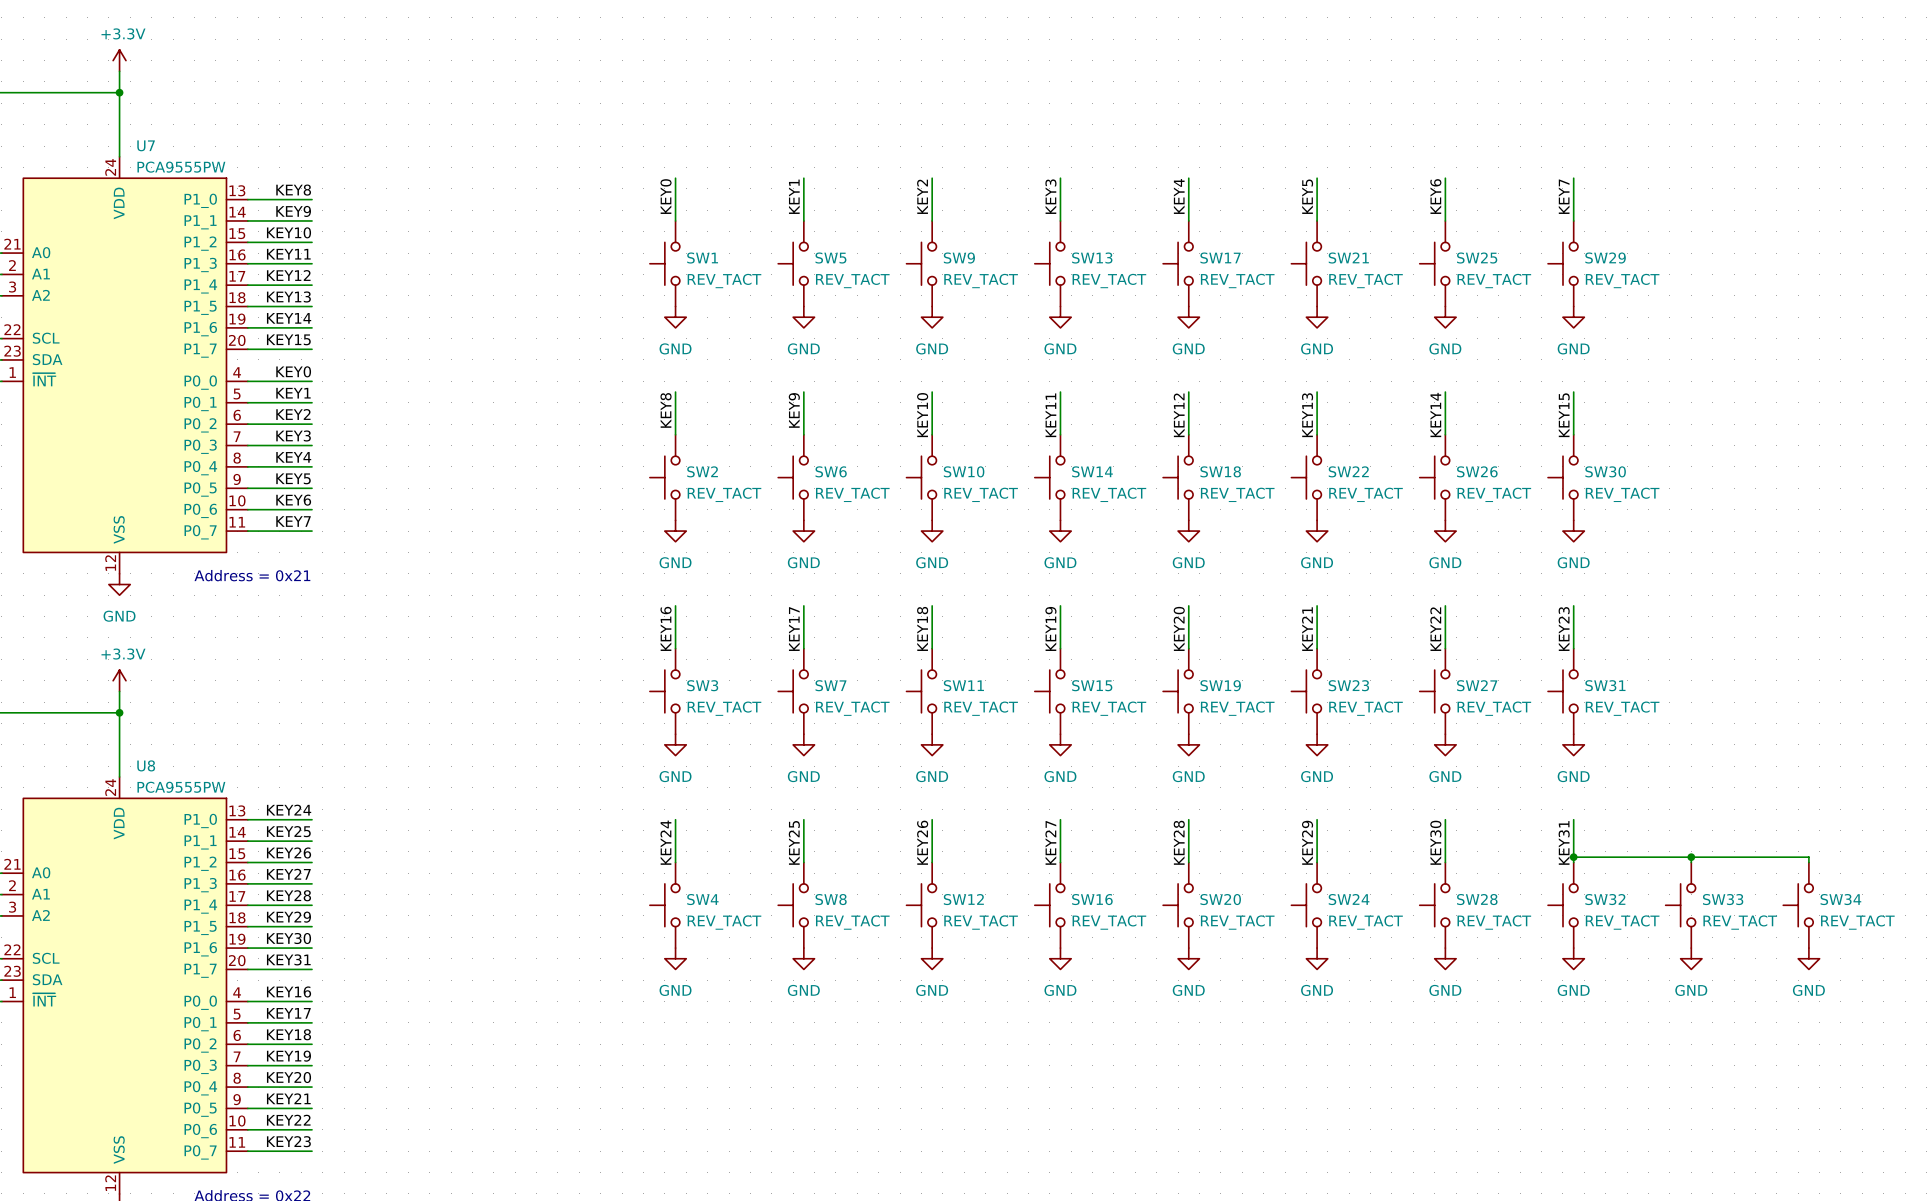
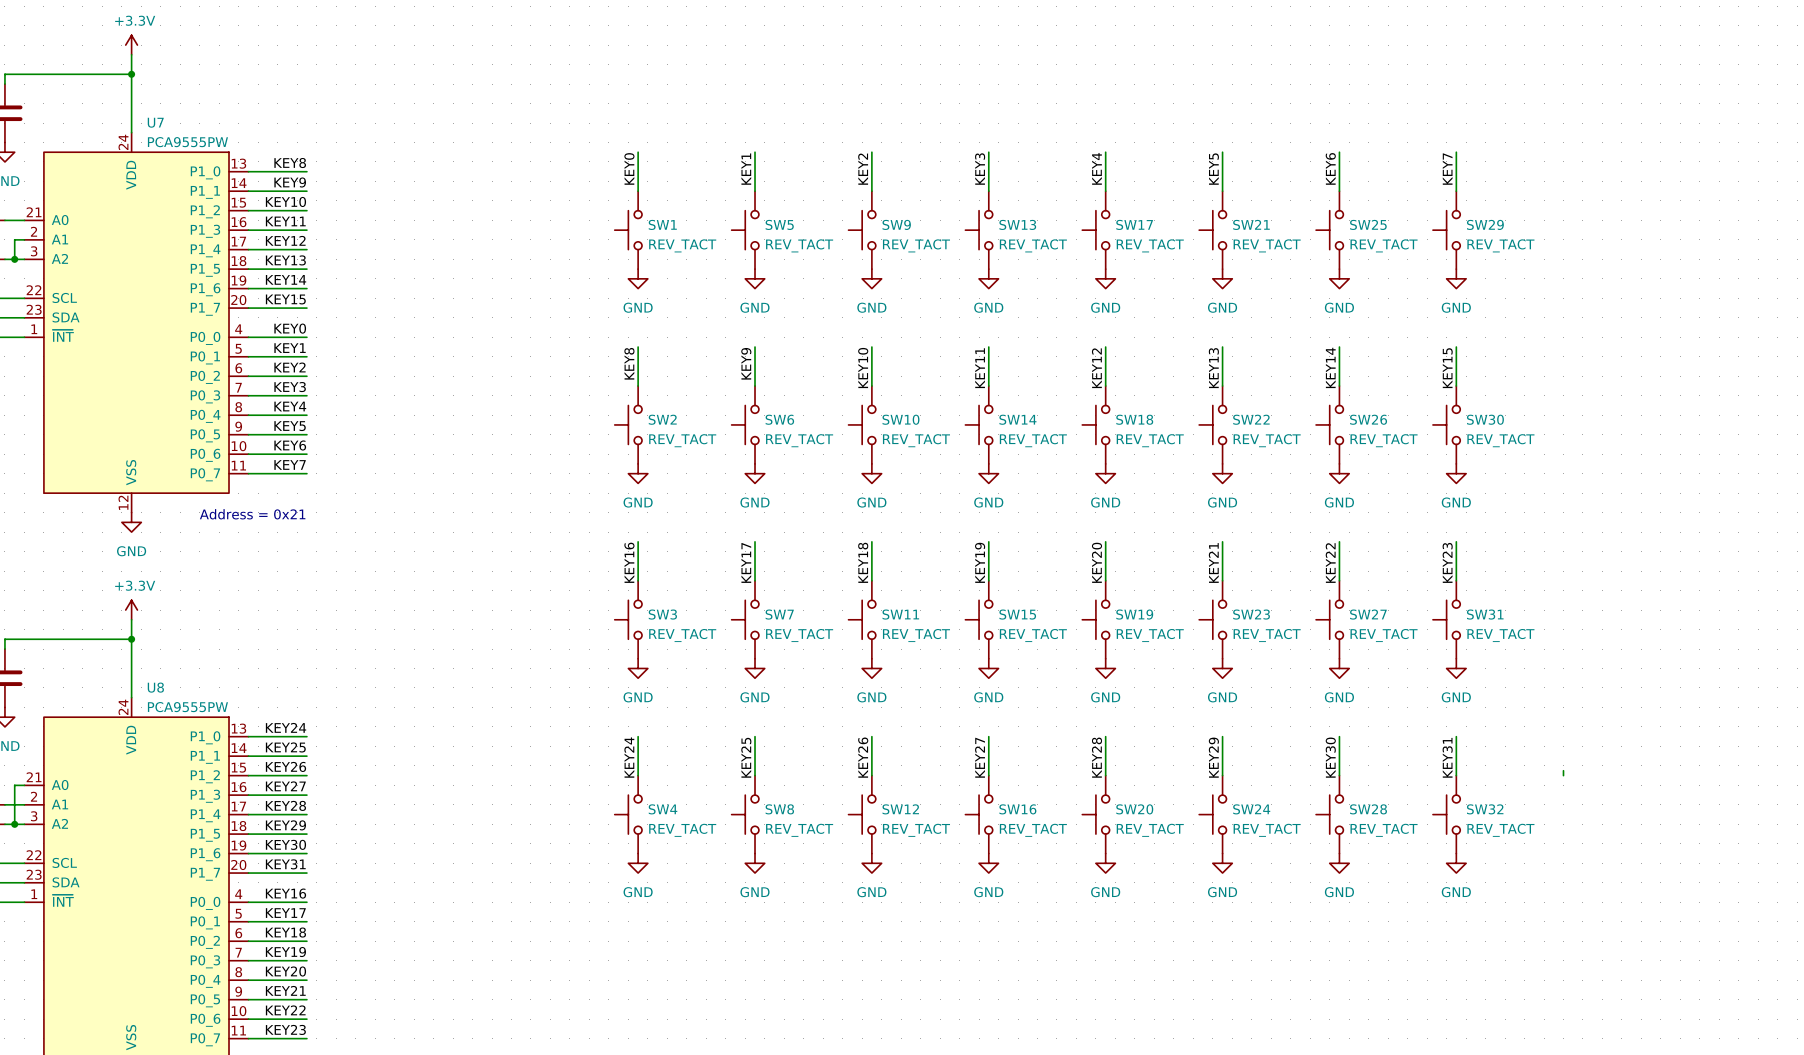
wire: (1573, 857) (1808, 857) (1808, 862) -> none
junction: (1573, 857) -> none
junction: (1691, 857) -> none
SW33: REV_TACT (1680, 905) -> none
SW34: REV_TACT (1798, 905) -> none
power symbol: GND (1691, 958) -> none
power symbol: GND (1808, 958) -> none

